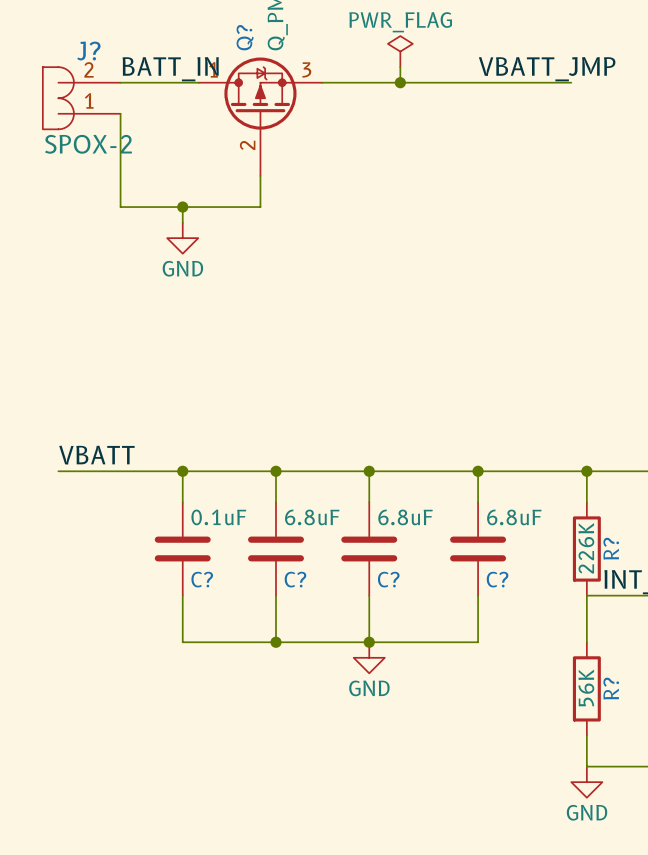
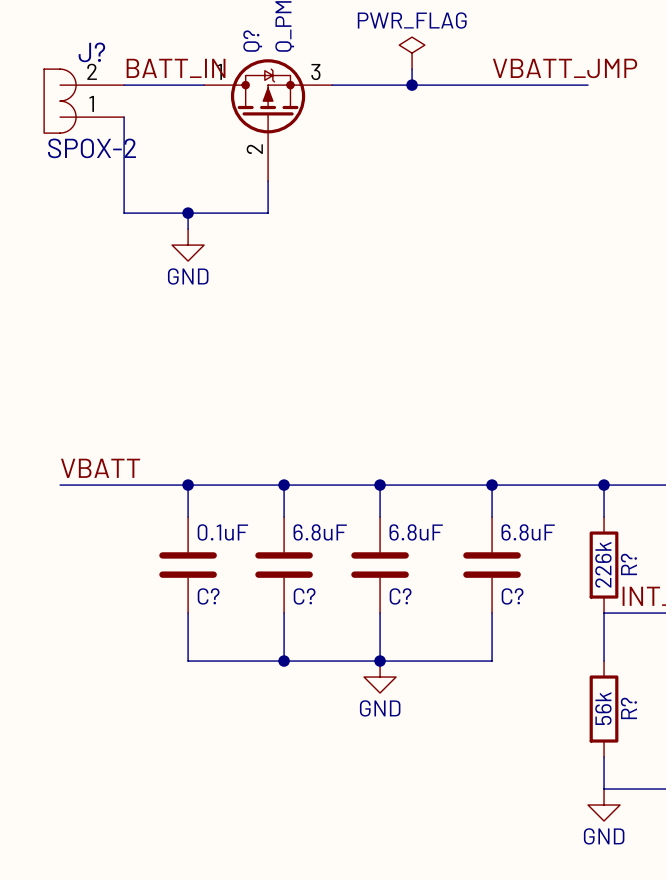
R? value: 226K (586, 548) -> 226k (603, 564)
R? value: 56K (586, 687) -> 56k (603, 708)

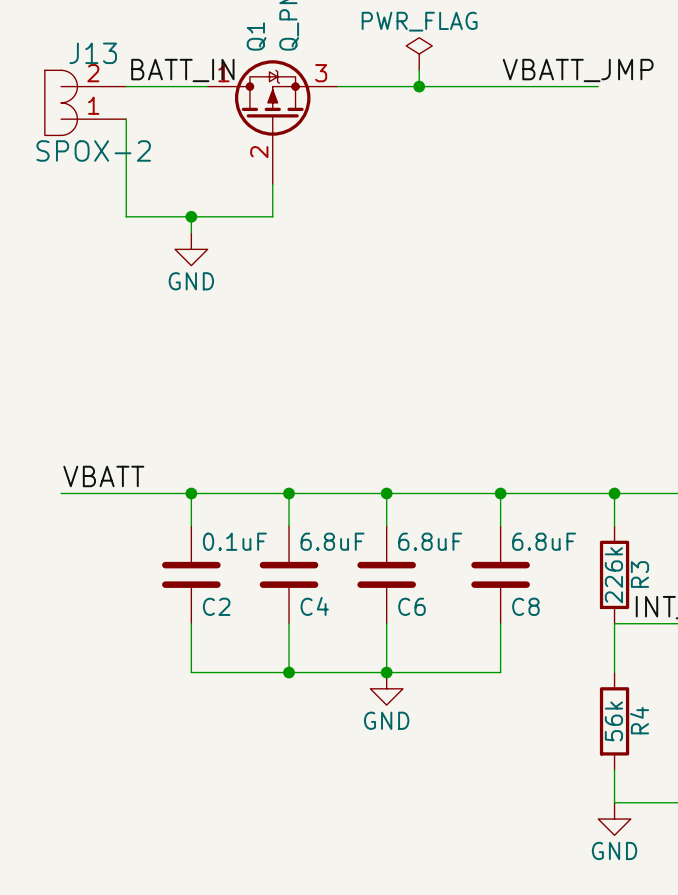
Q? name: Q? (252, 41) -> Q1 (256, 36)
J? name: J? (91, 52) -> J13 (93, 53)
R? name: R? (628, 564) -> R3 (639, 574)
C? name: C? (208, 596) -> C2 (216, 606)
C? name: C? (304, 596) -> C4 (314, 606)
C? name: C? (400, 596) -> C6 (411, 606)
C? name: C? (512, 596) -> C8 (525, 606)
R? name: R? (628, 708) -> R4 (639, 720)

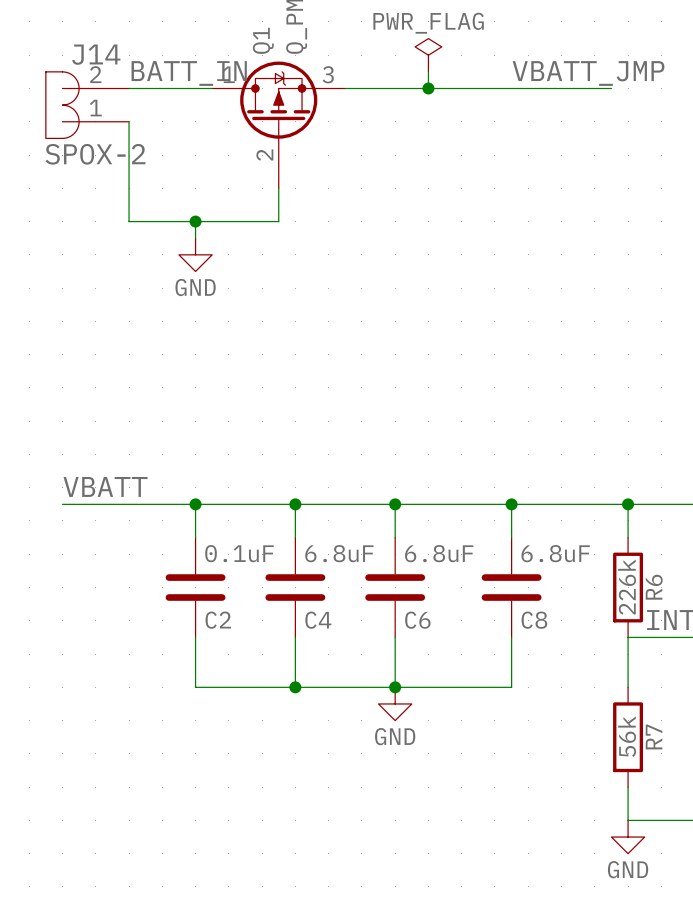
J13 name: J13 (93, 53) -> J14 (96, 54)
R3 name: R3 (639, 574) -> R6 (654, 587)
R4 name: R4 (639, 720) -> R7 (654, 736)

